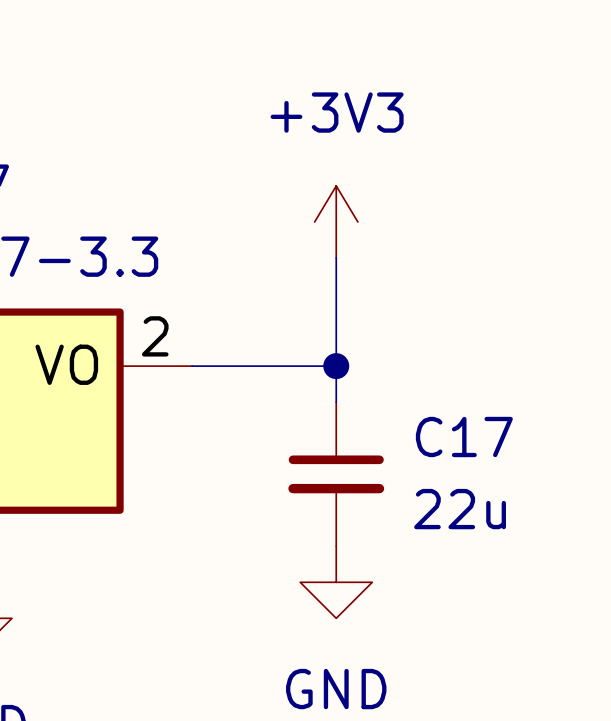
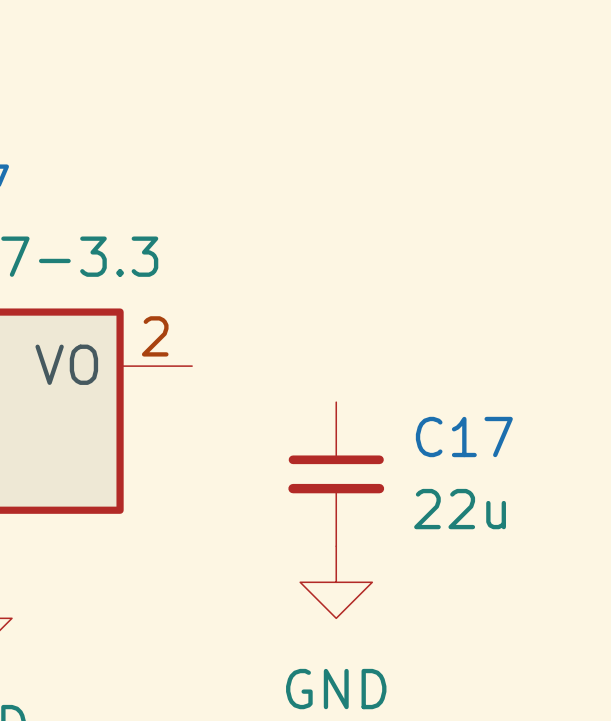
power symbol: +3V3 (336, 221) -> none
wire: (336, 258) (336, 402) -> none
wire: (192, 366) (336, 366) -> none
junction: (336, 366) -> none

